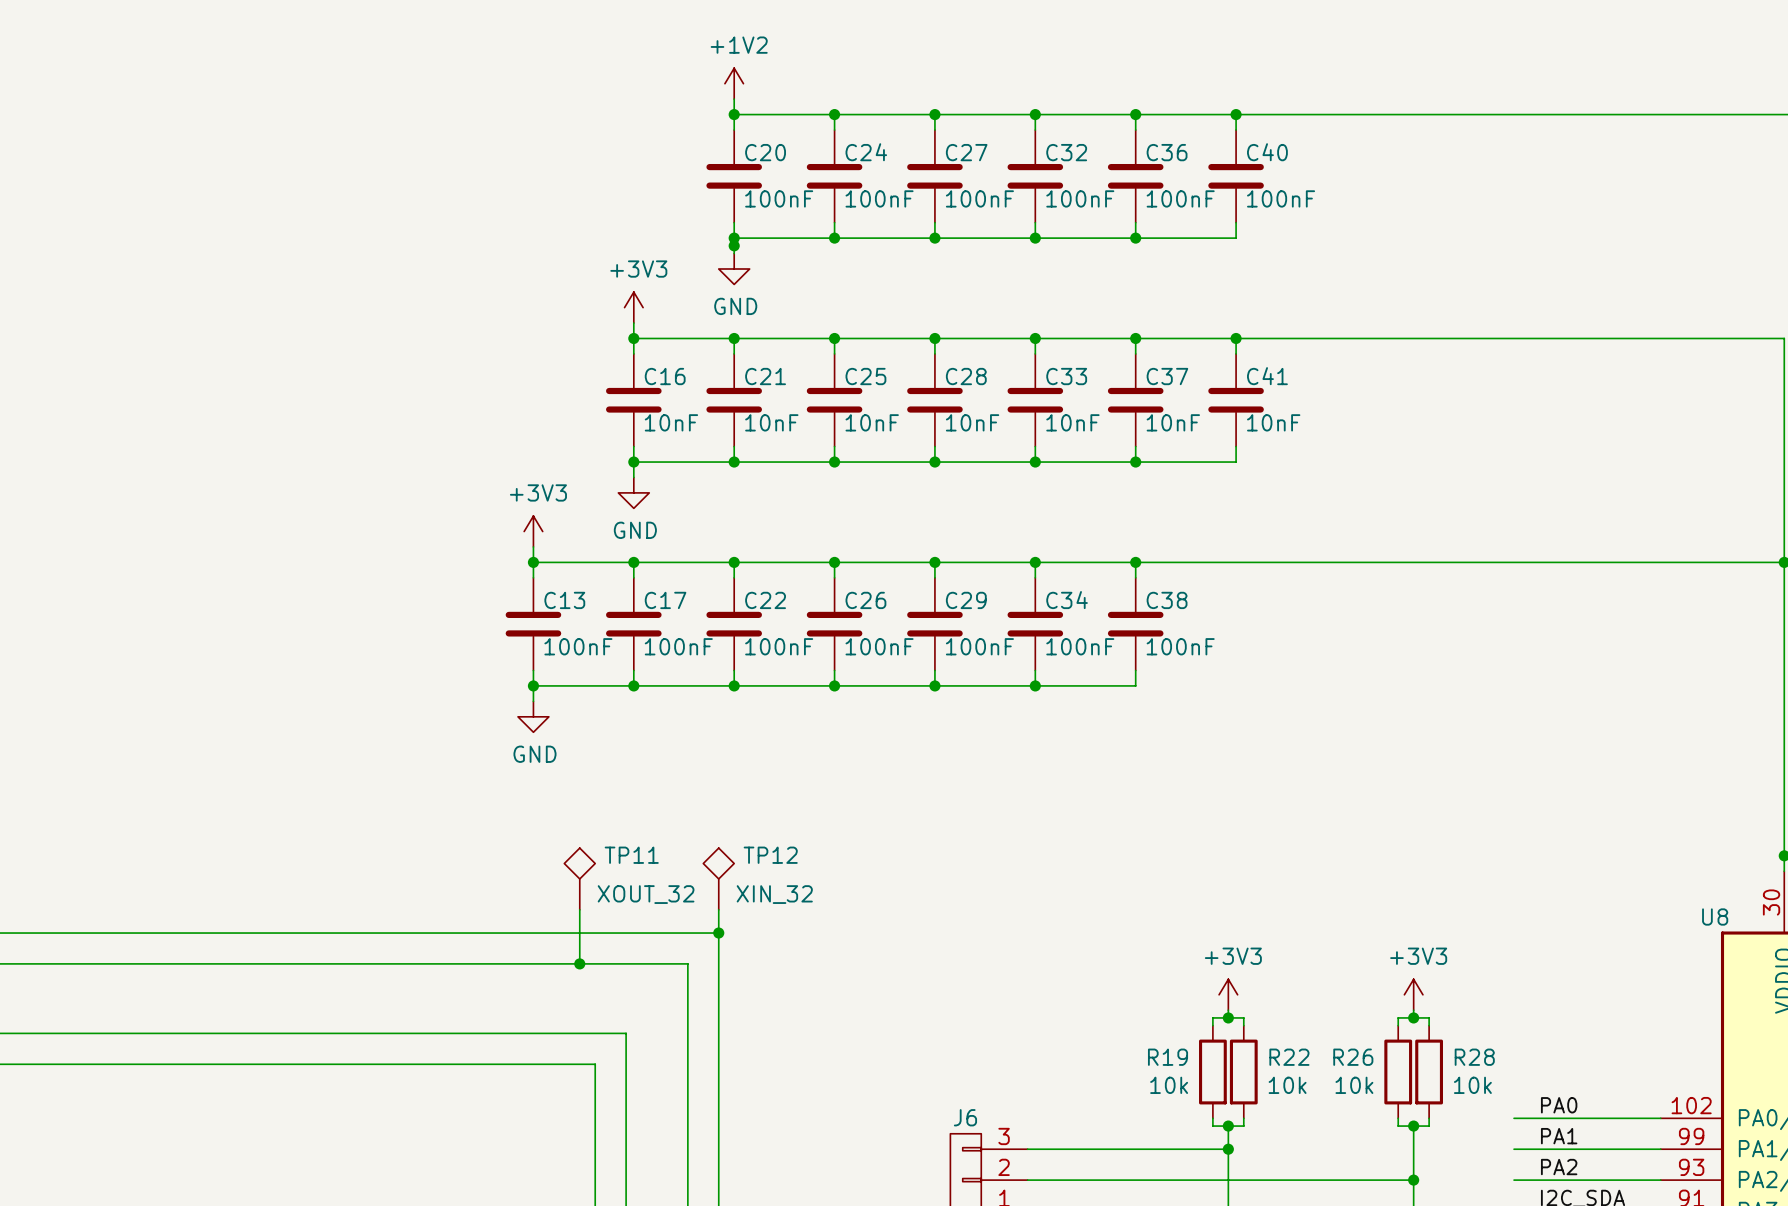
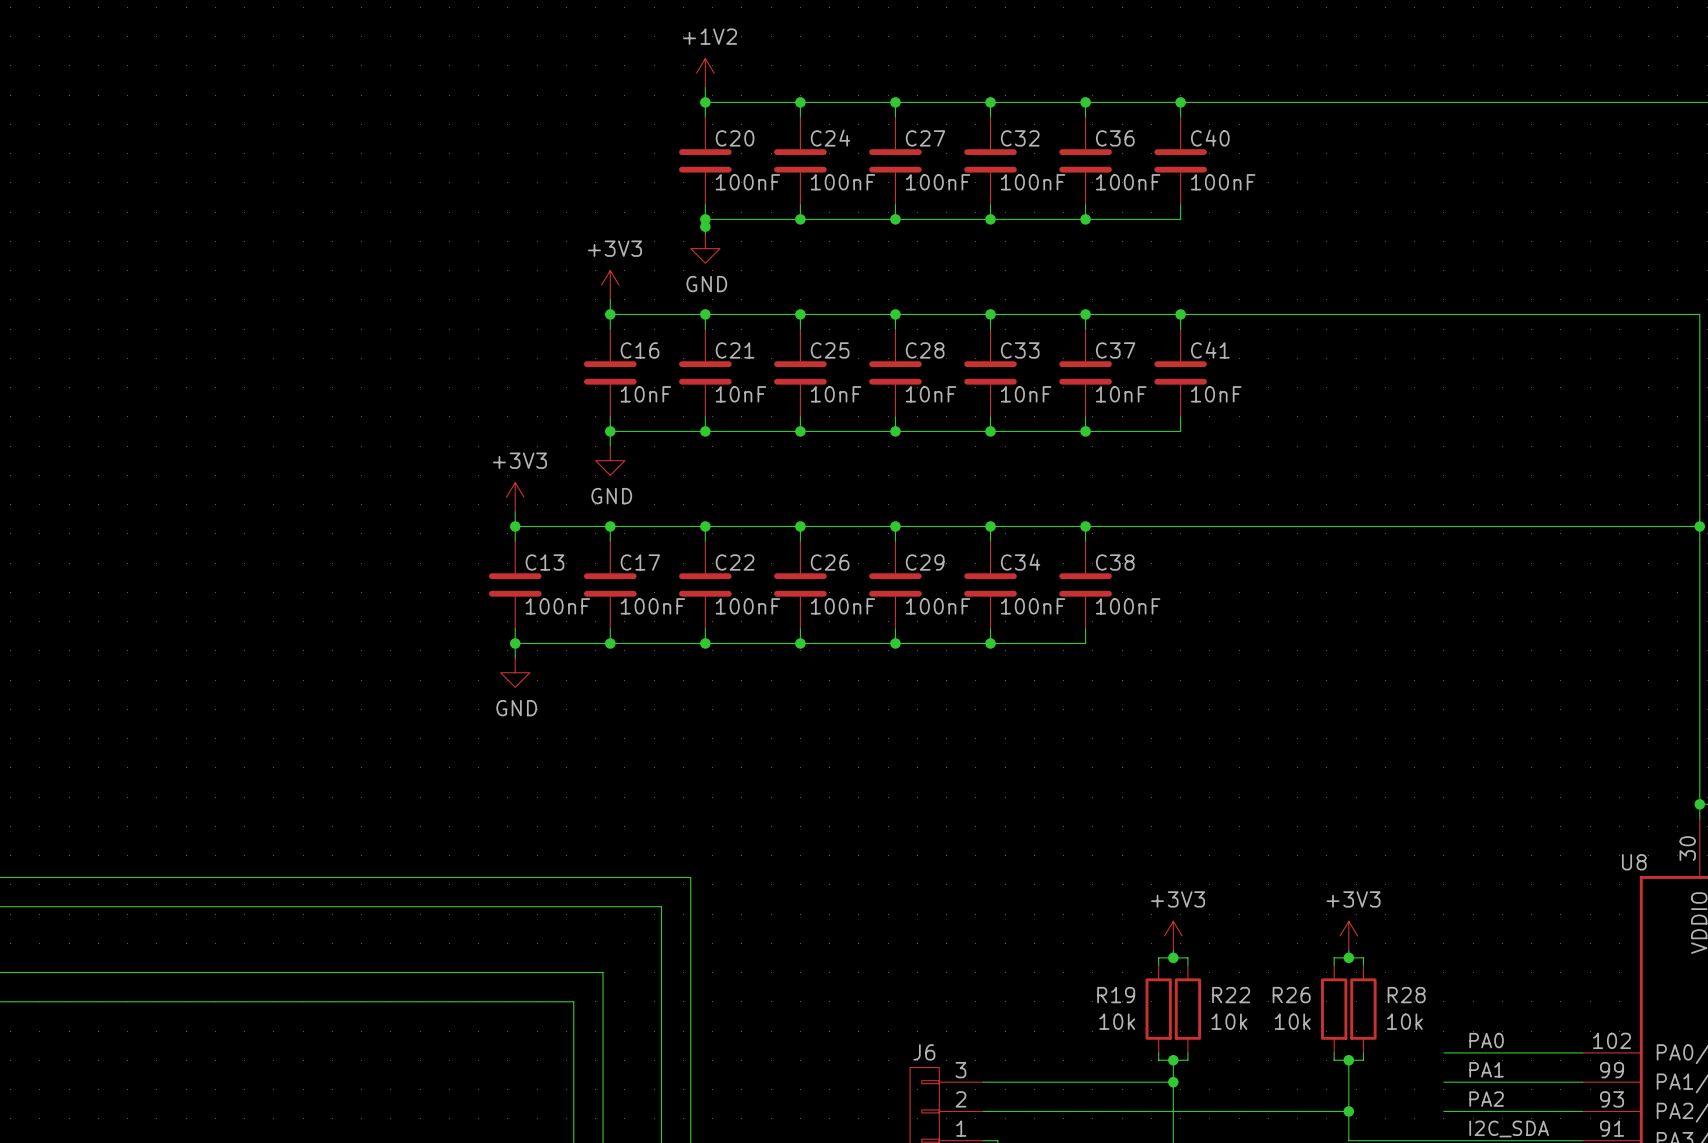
TP11: XOUT_32 (579, 878) -> none
TP12: XIN_32 (718, 878) -> none
wire: (579, 909) (579, 963) -> none
wire: (718, 909) (718, 933) -> none
junction: (718, 933) -> none
junction: (579, 963) -> none

